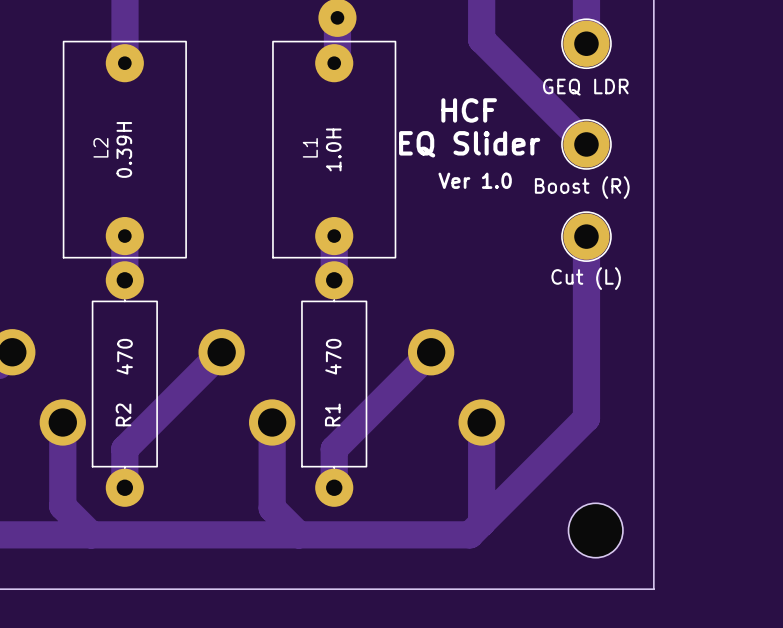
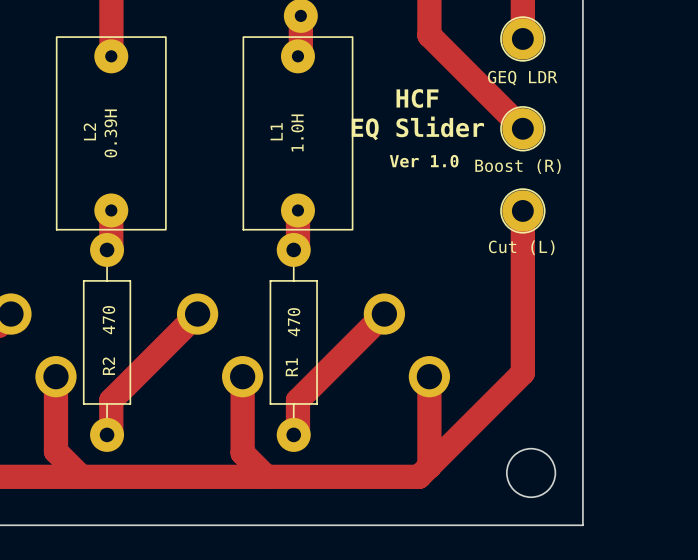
R2 footprint: [91, 261, 158, 507] -> [83, 232, 132, 452]
R1 footprint: [301, 261, 368, 507] -> [269, 232, 318, 452]

